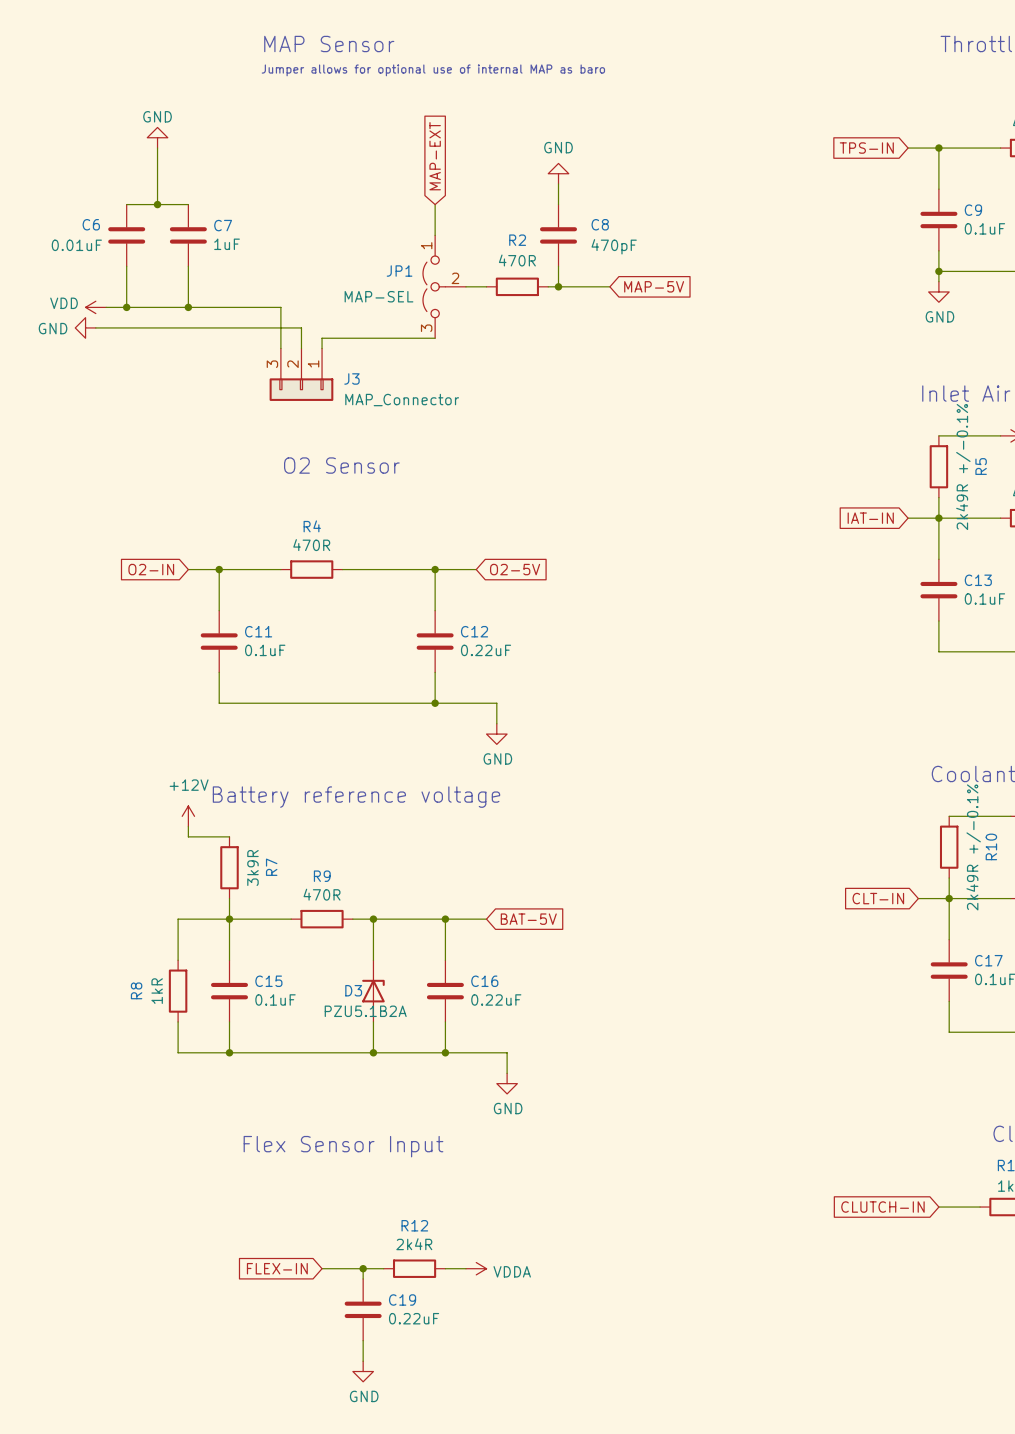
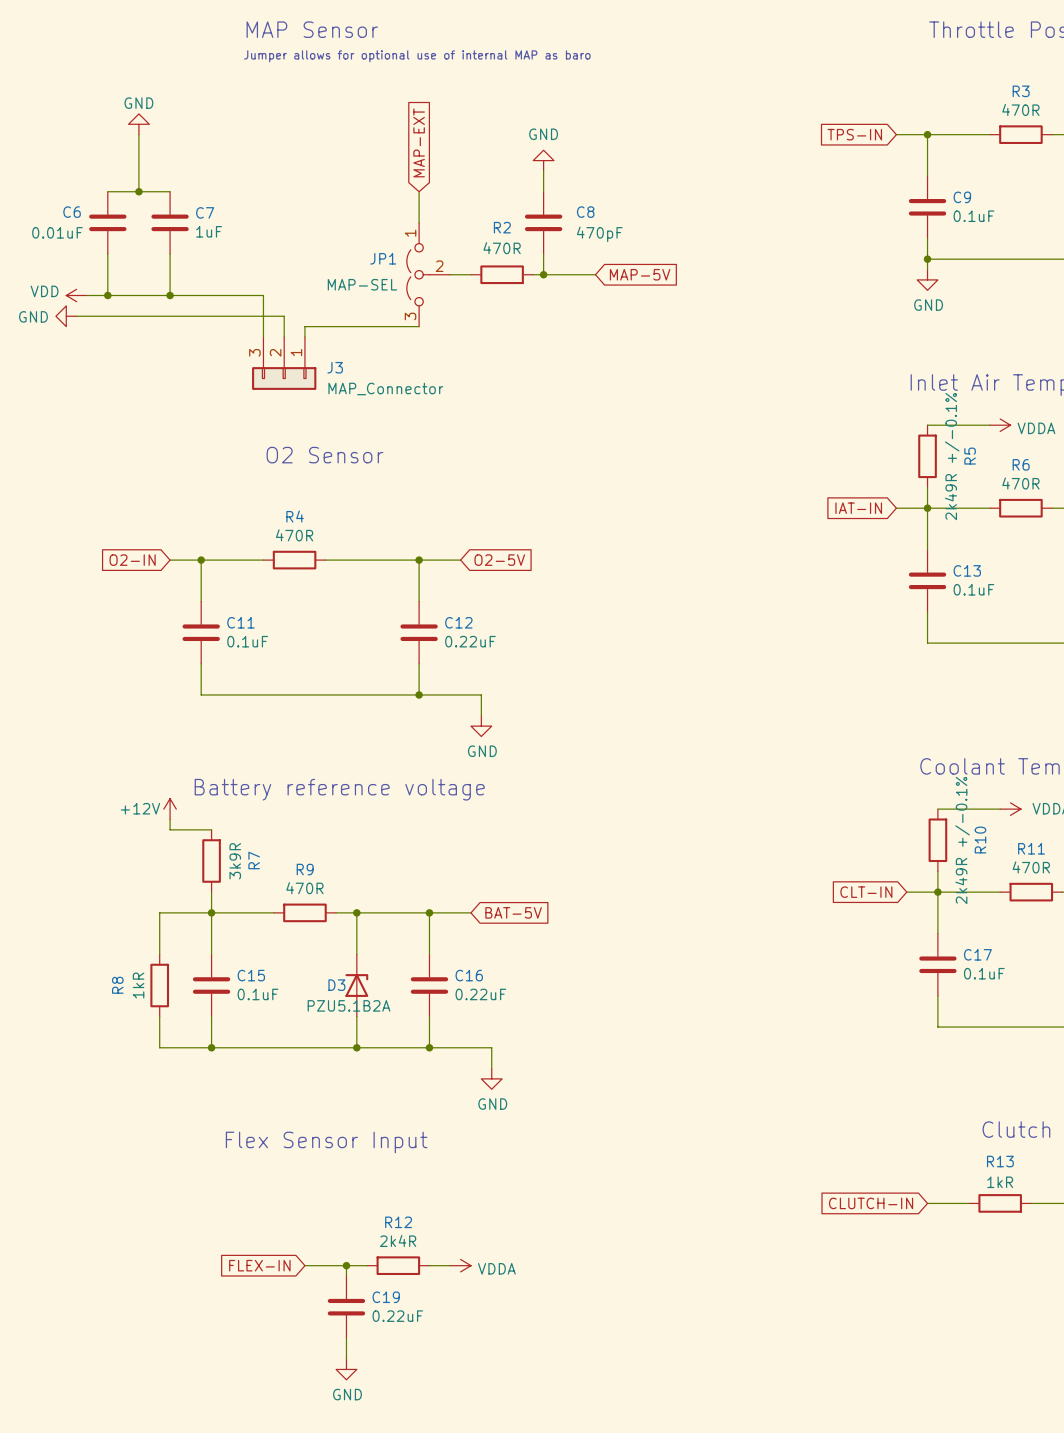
power symbol text position: +12V (189, 785) -> +12V (140, 808)

